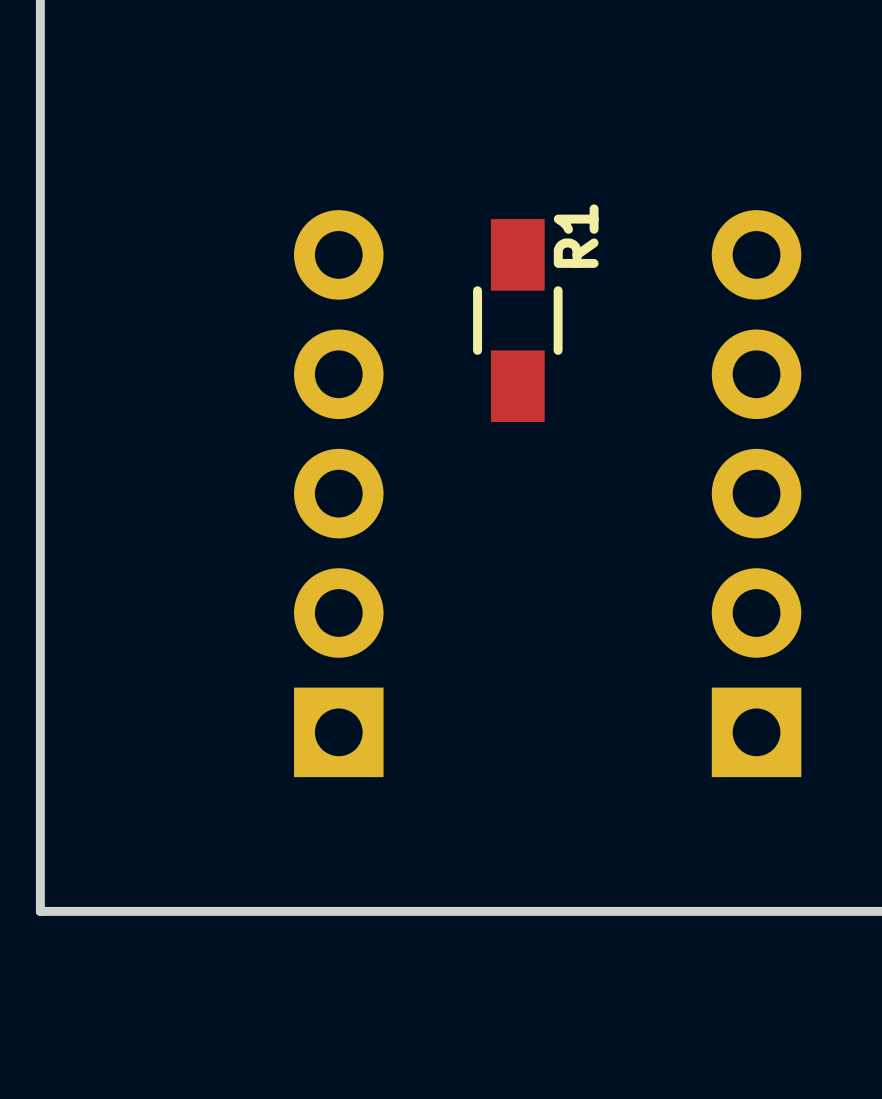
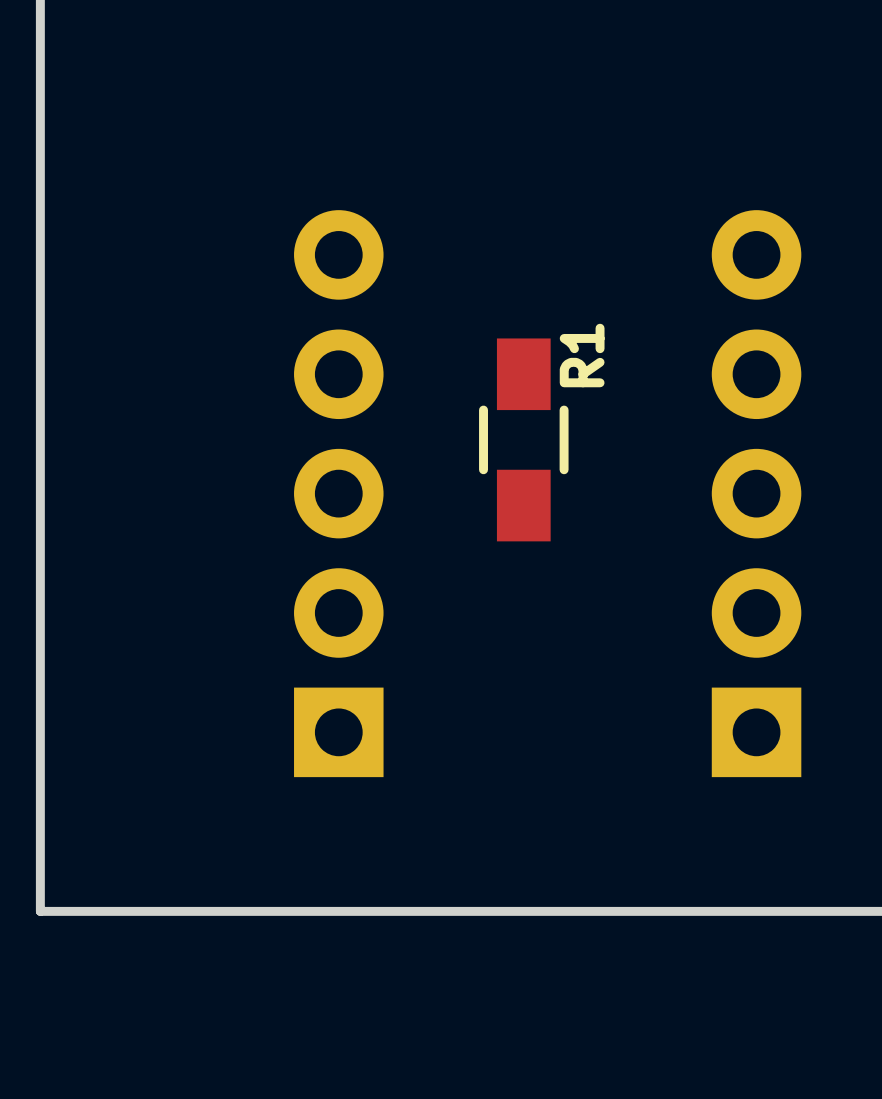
R1 position: (517, 320) -> (523, 439)

